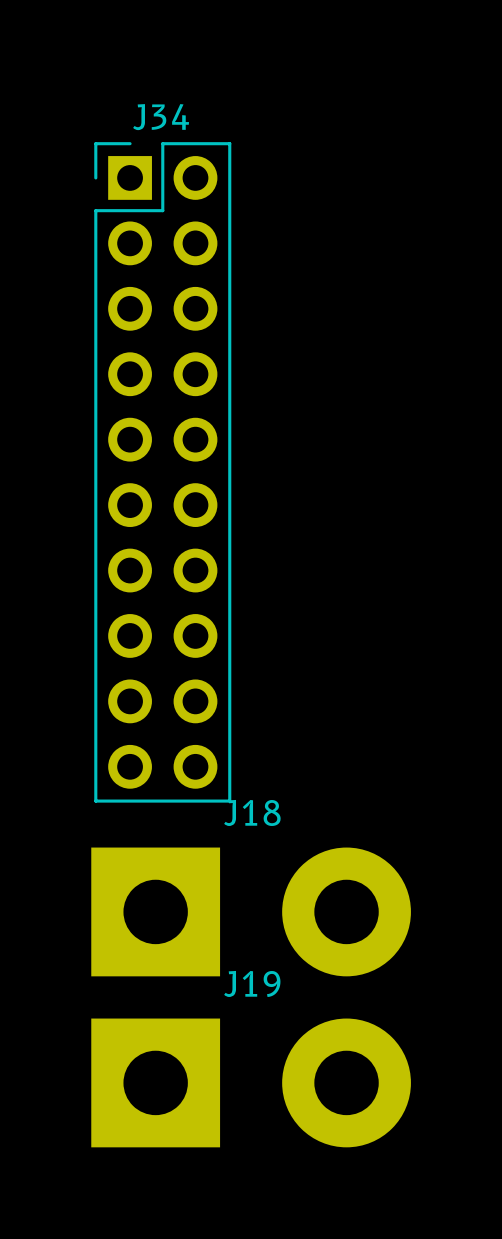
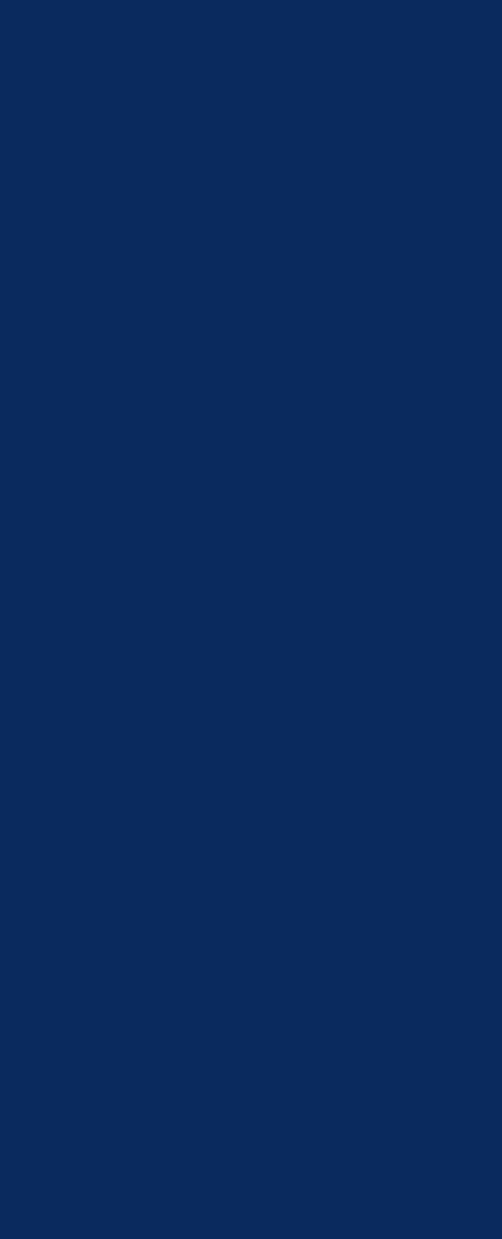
J34: (162, 472) -> none
J18: (251, 911) -> none
J19: (251, 1082) -> none

